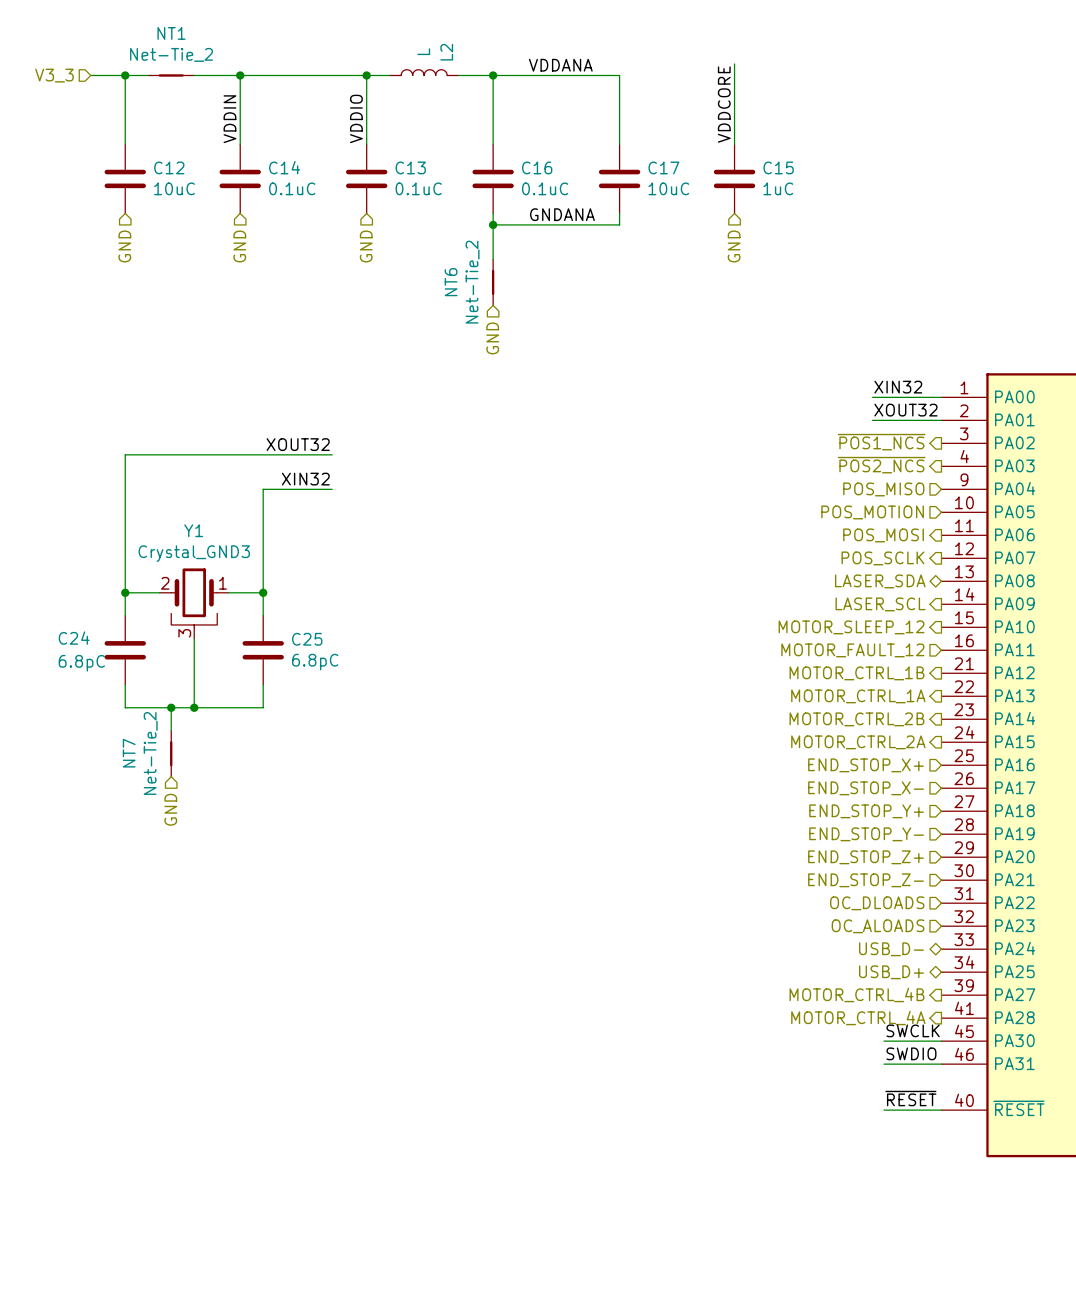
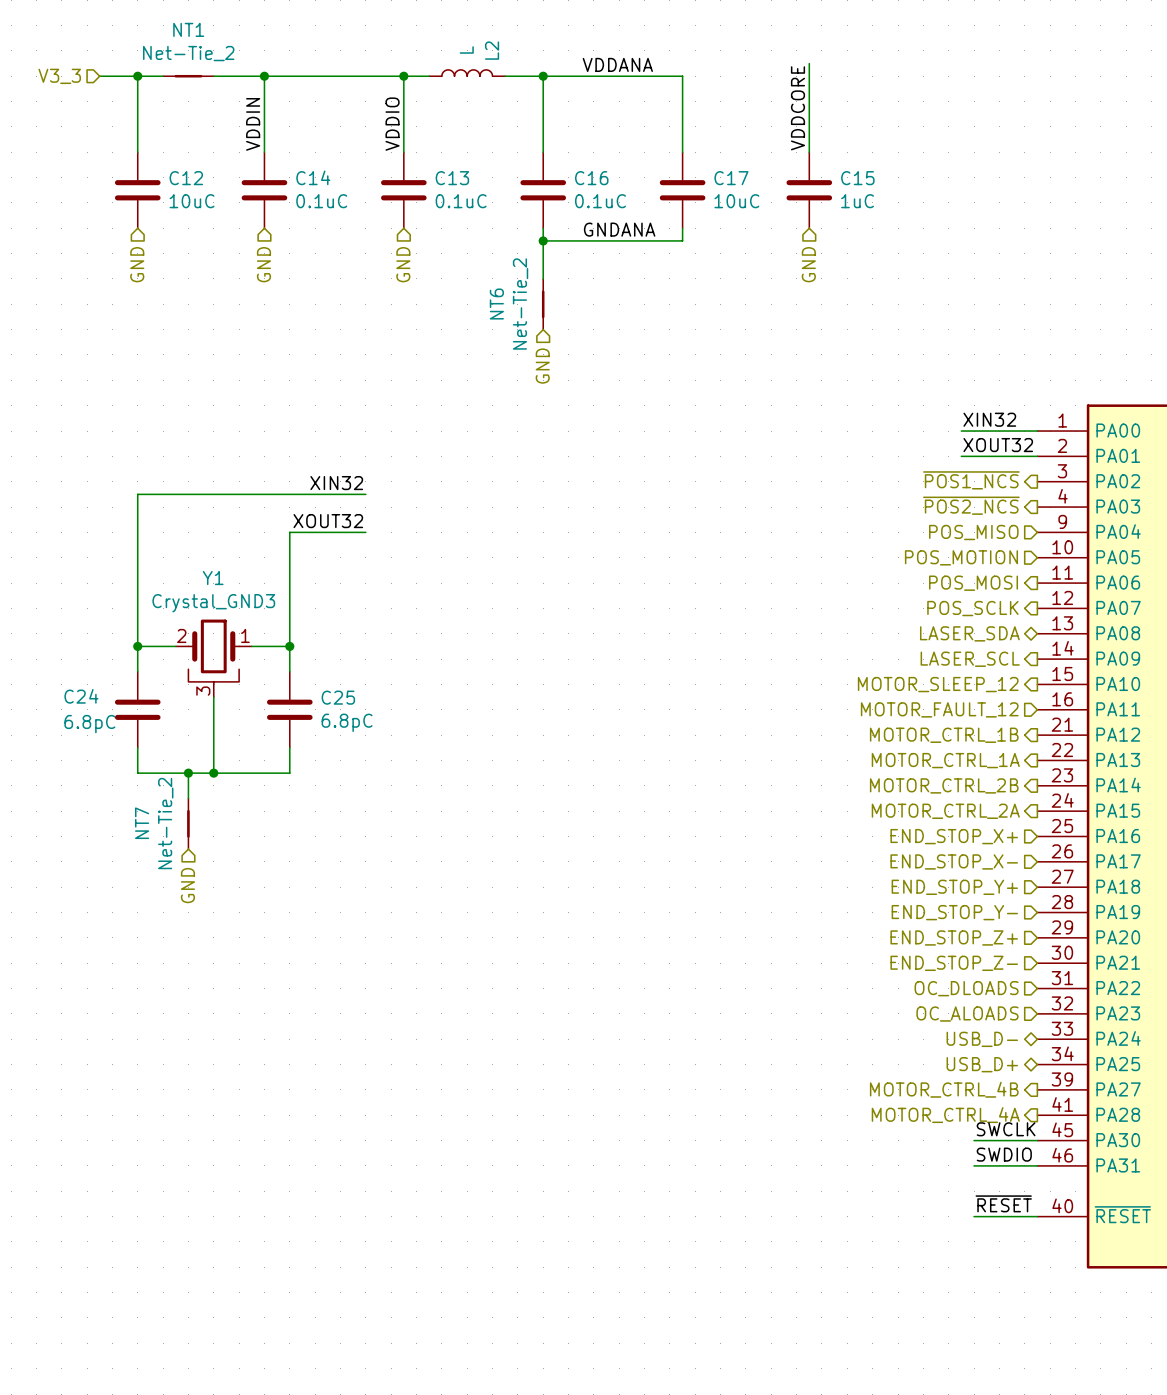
label: XOUT32 (298, 444) -> XIN32 (336, 483)
label: XIN32 (305, 479) -> XOUT32 (328, 521)

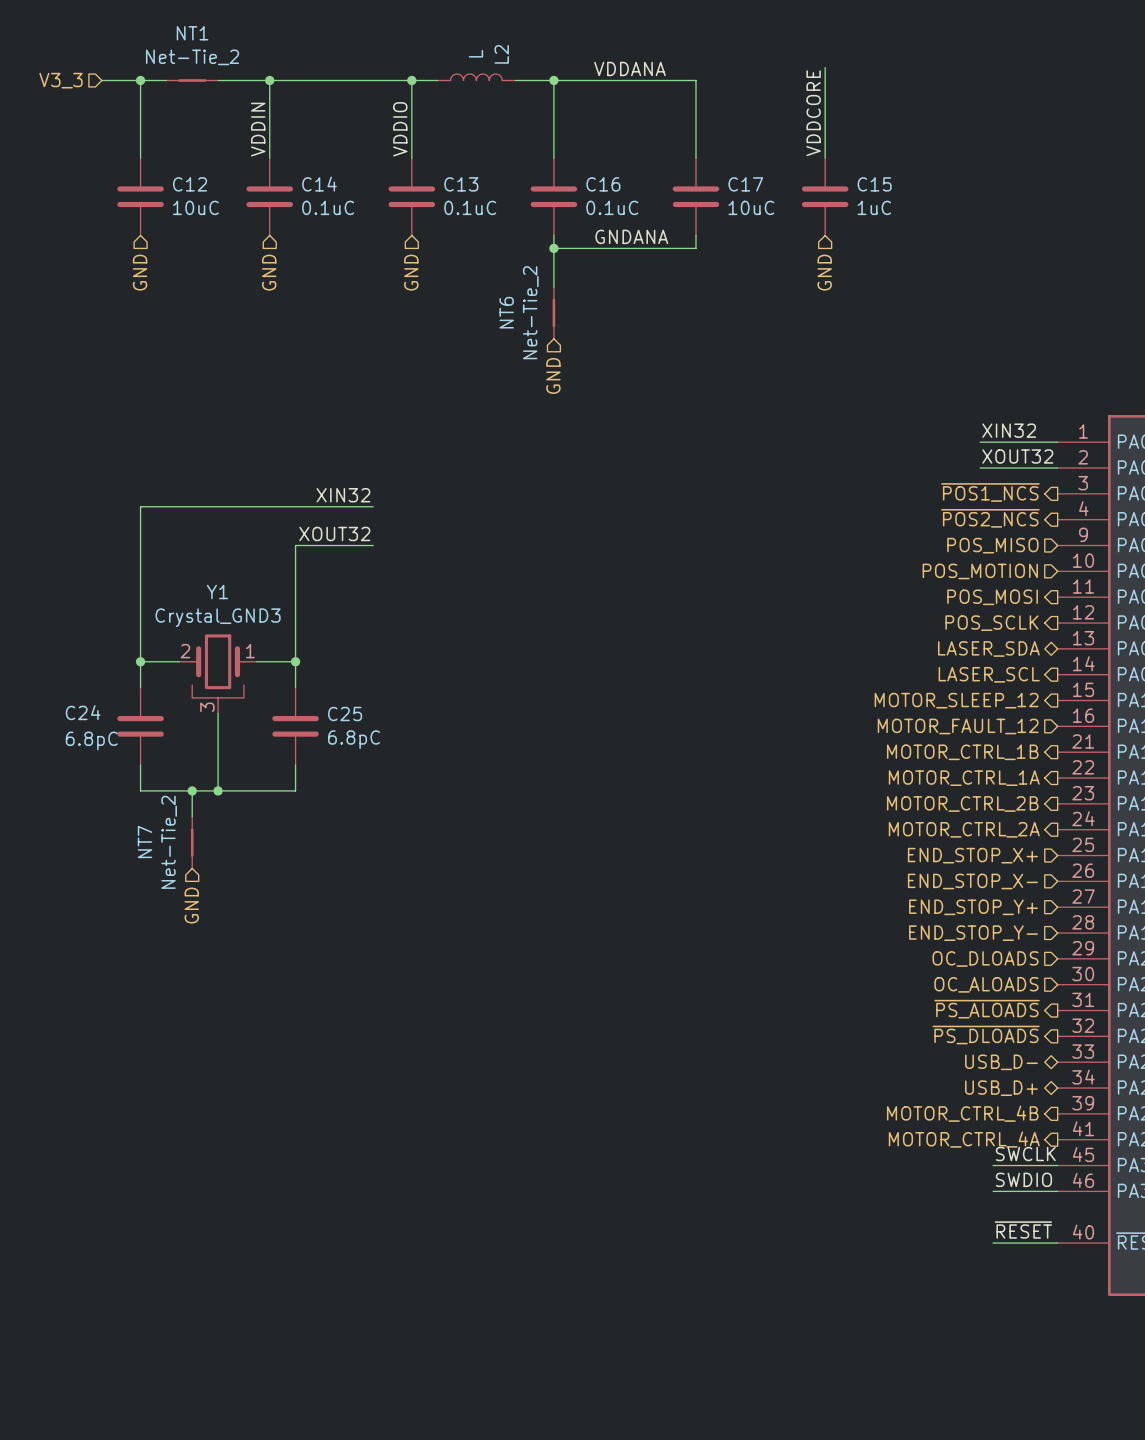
hierarchical label: END_STOP_Z+ (954, 937) -> OC_DLOADS (985, 958)
hierarchical label: END_STOP_Z- (954, 963) -> OC_ALOADS (986, 984)
hierarchical label shape: input (966, 988) -> output (987, 1009)
hierarchical label: OC_DLOADS (966, 988) -> ~{PS_ALOADS} (987, 1009)
hierarchical label shape: input (967, 1014) -> output (986, 1035)
hierarchical label: OC_ALOADS (967, 1014) -> ~{PS_DLOADS} (986, 1035)

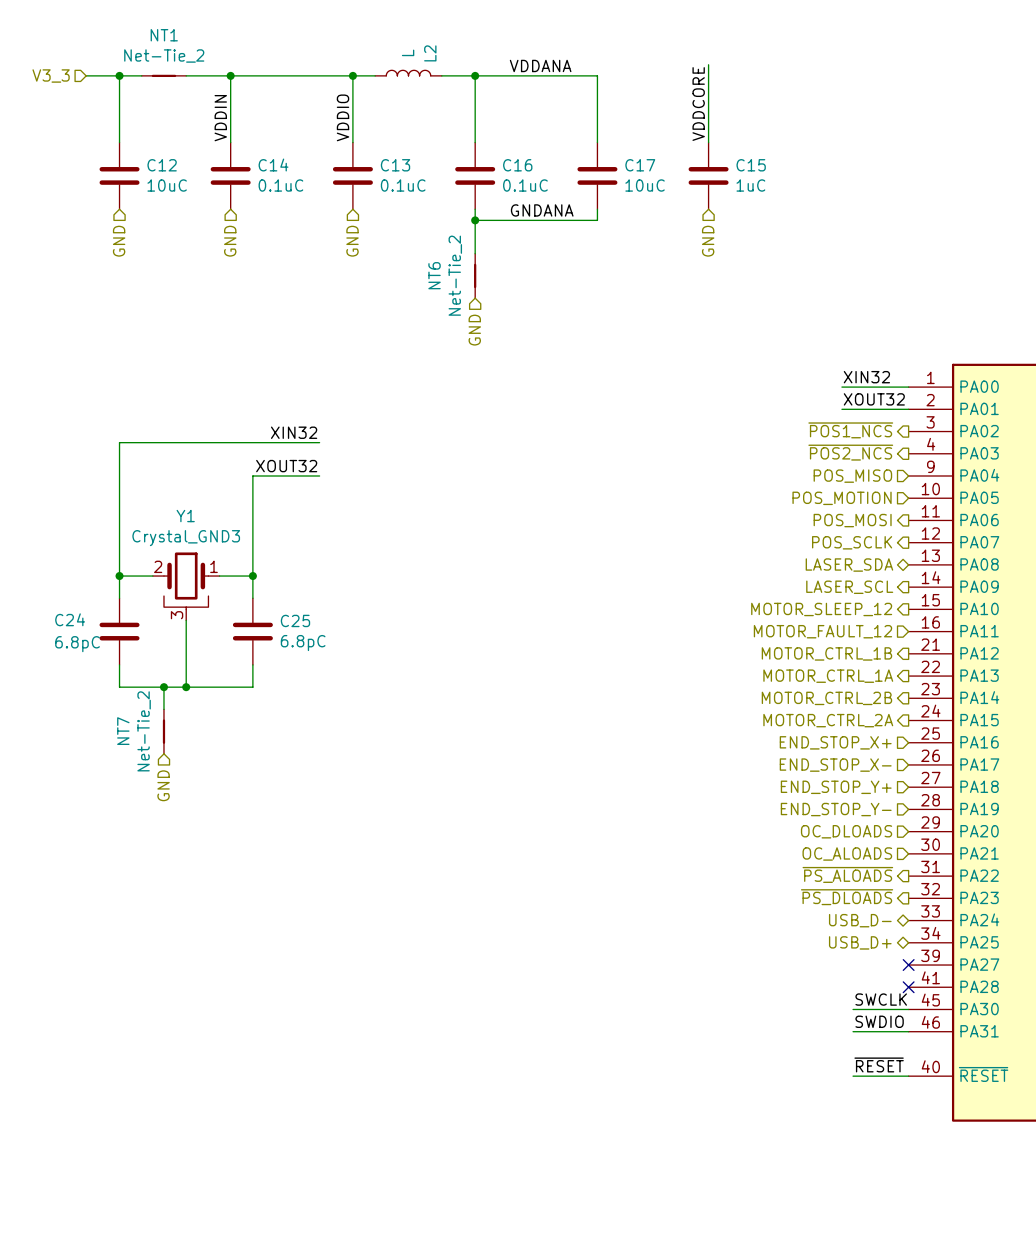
hierarchical label: MOTOR_CTRL_4B (962, 1113) -> none
no-connect mark: none -> (908, 965)
hierarchical label: MOTOR_CTRL_4A (964, 1139) -> none
no-connect mark: none -> (908, 987)

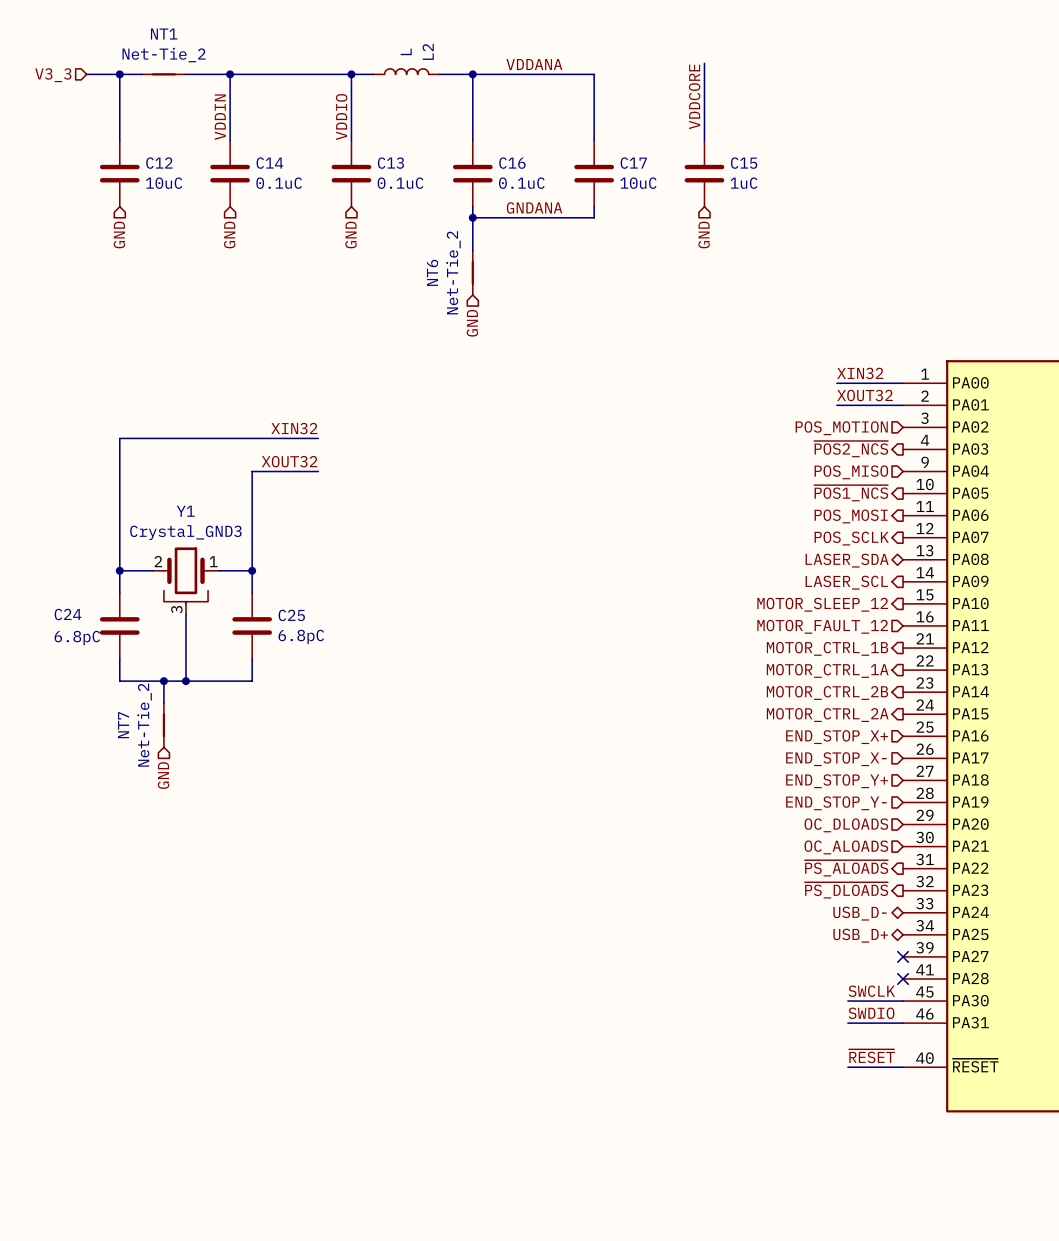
hierarchical label shape: output (850, 430) -> input (841, 428)
hierarchical label: ~{POS1_NCS} (850, 430) -> POS_MOTION (841, 428)
hierarchical label shape: input (842, 498) -> output (851, 493)
hierarchical label: POS_MOTION (842, 498) -> ~{POS1_NCS} (851, 493)

